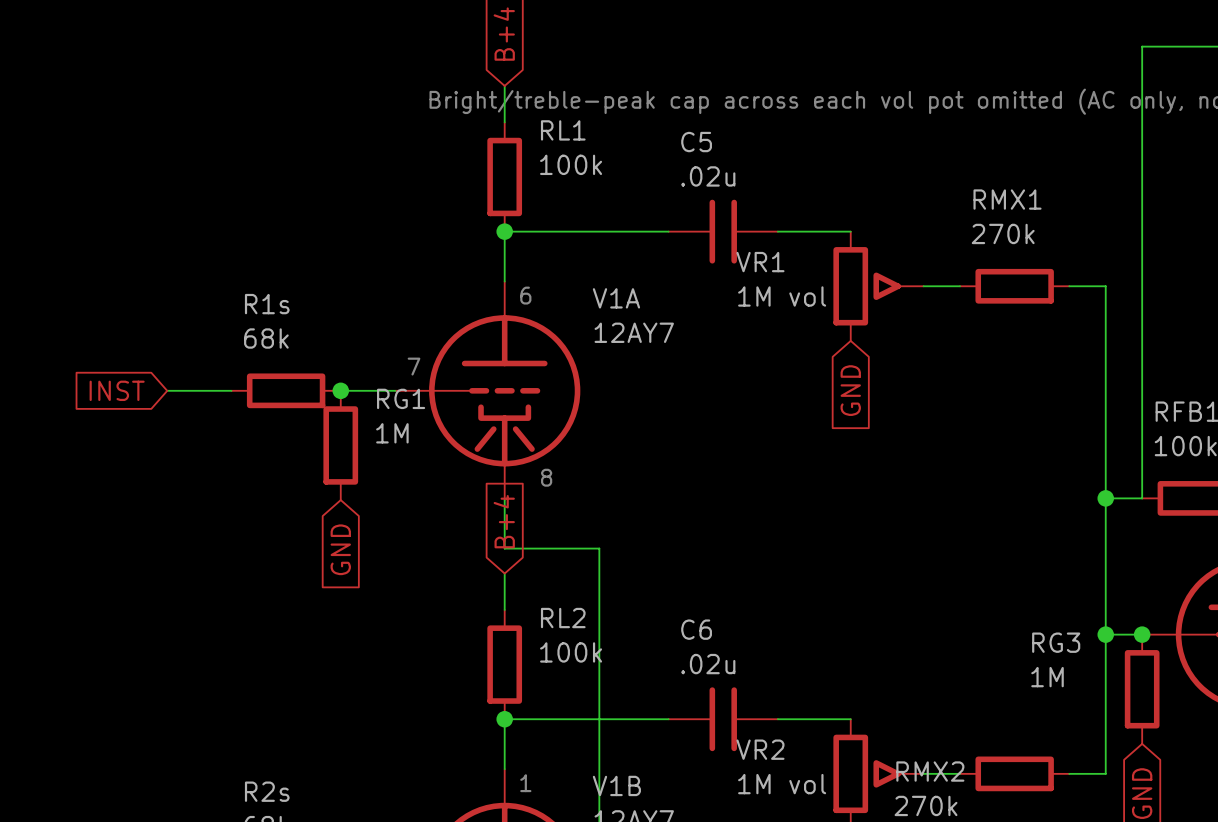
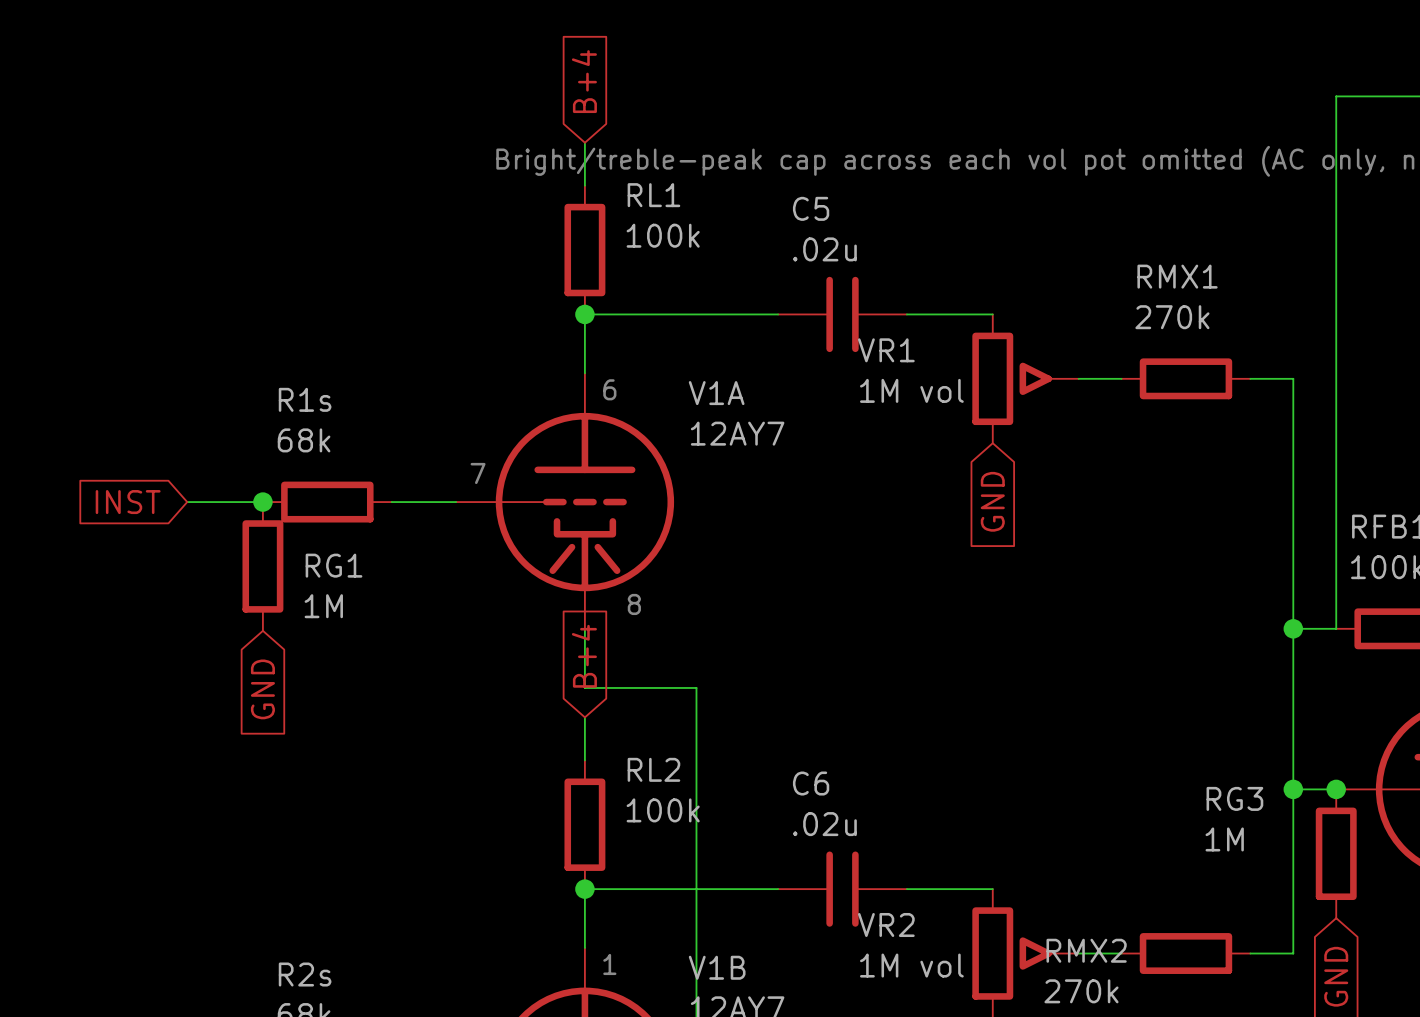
junction: none -> (262, 502)
junction: (340, 390) -> none
RG1 name position: RG1 (401, 398) -> RG1 (334, 565)
RG1 value position: 1M (392, 433) -> 1M (323, 606)
RG1 position: (340, 445) -> (262, 566)
global label position: GND (340, 549) -> GND (262, 689)

